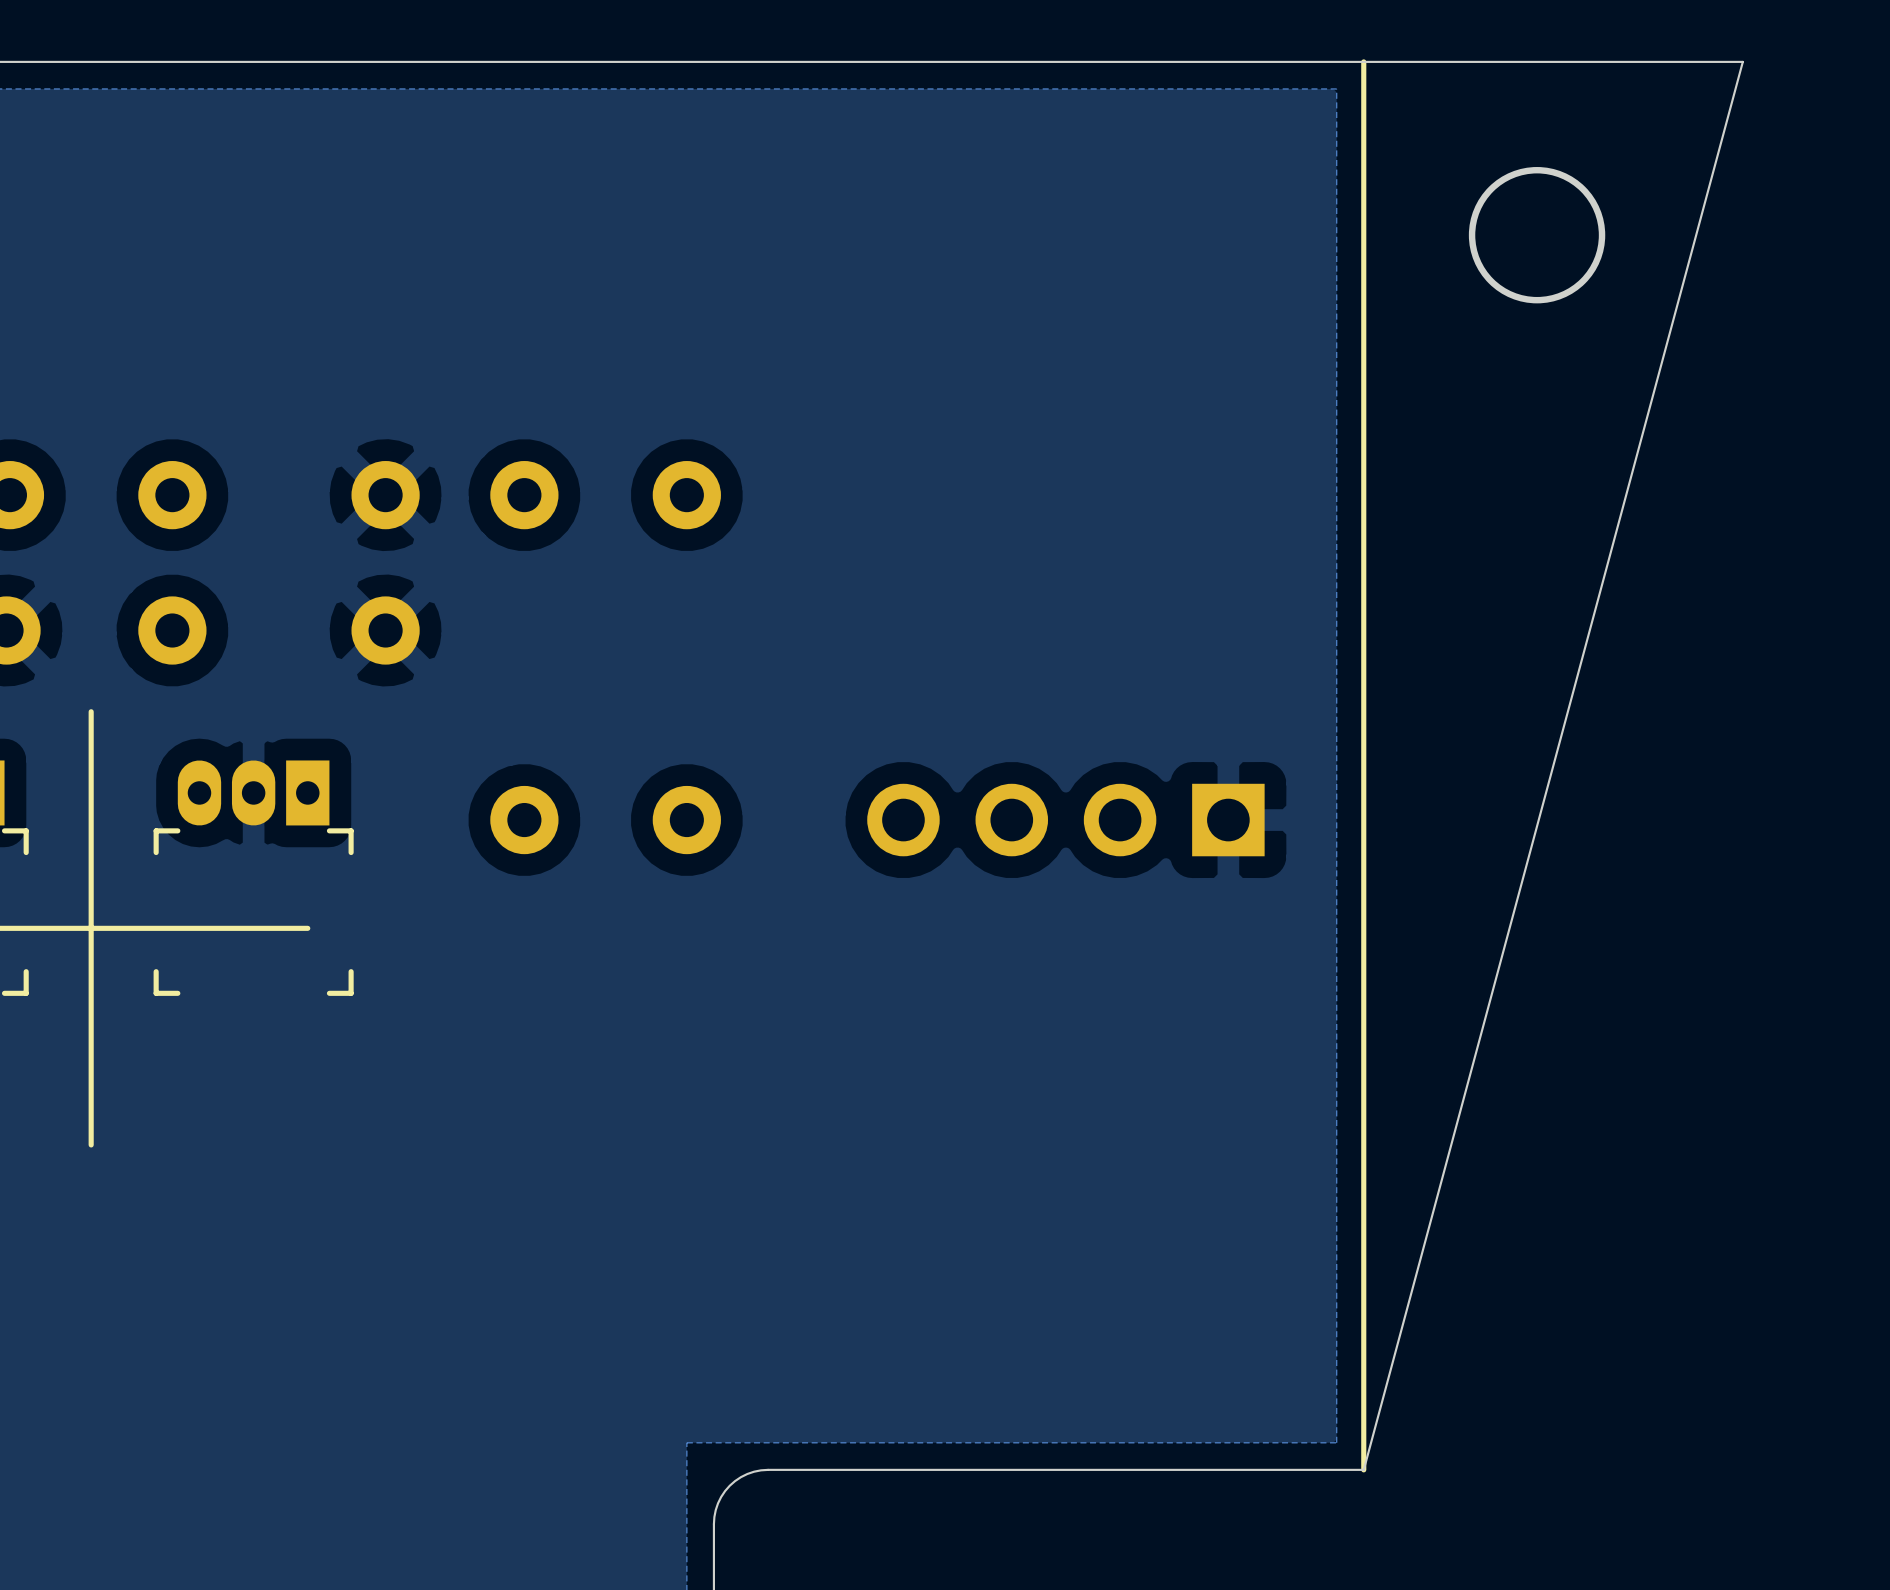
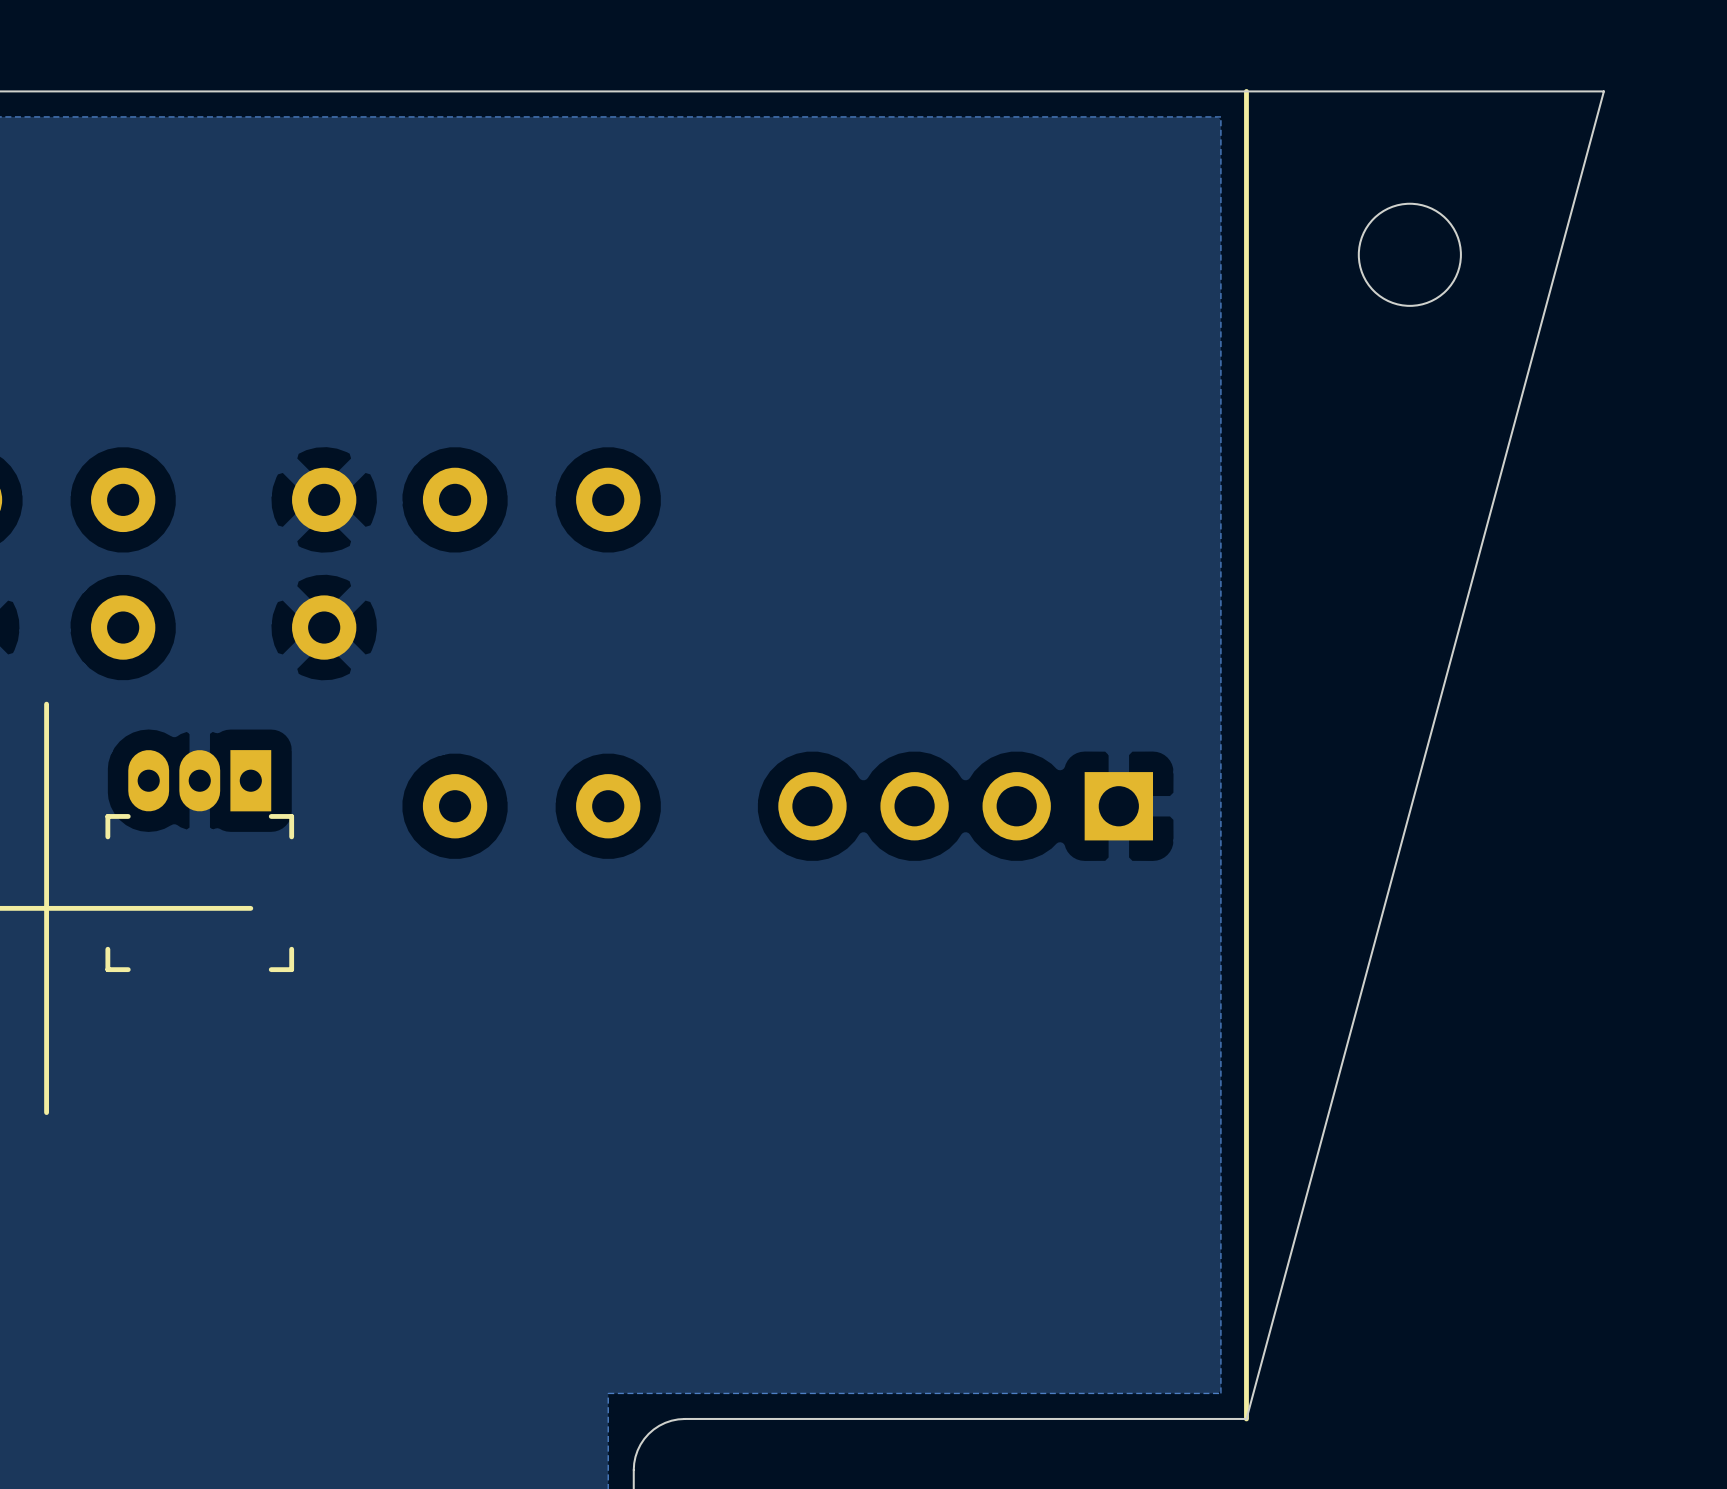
round board edge size: [1468, 167, 1606, 304] -> [1357, 202, 1462, 307]

